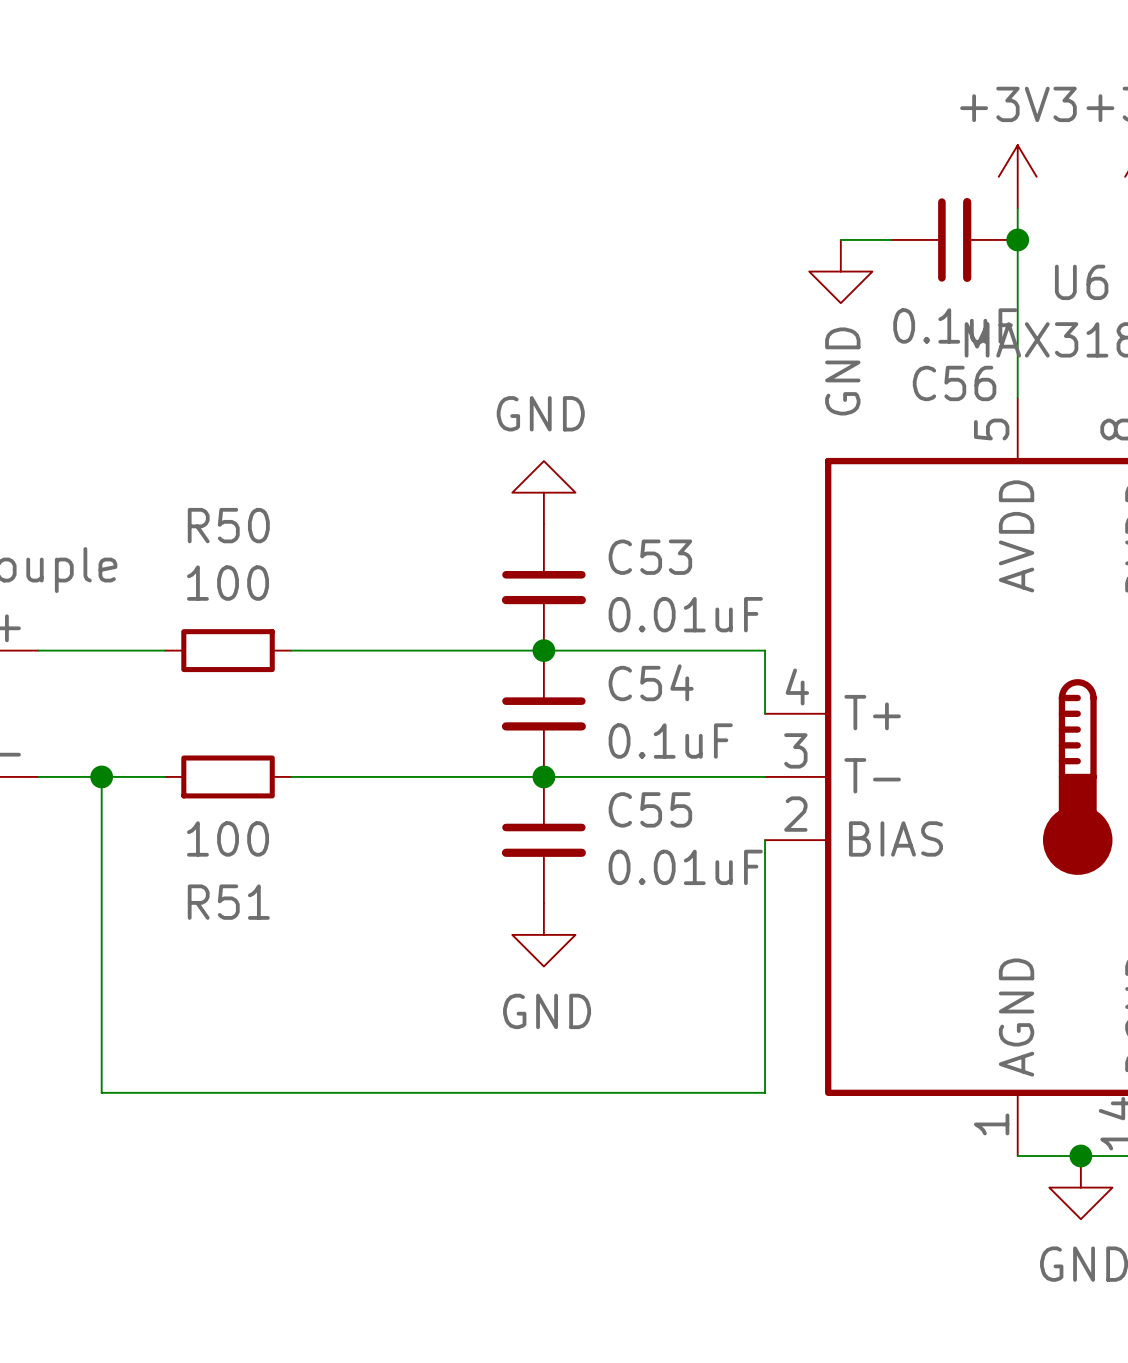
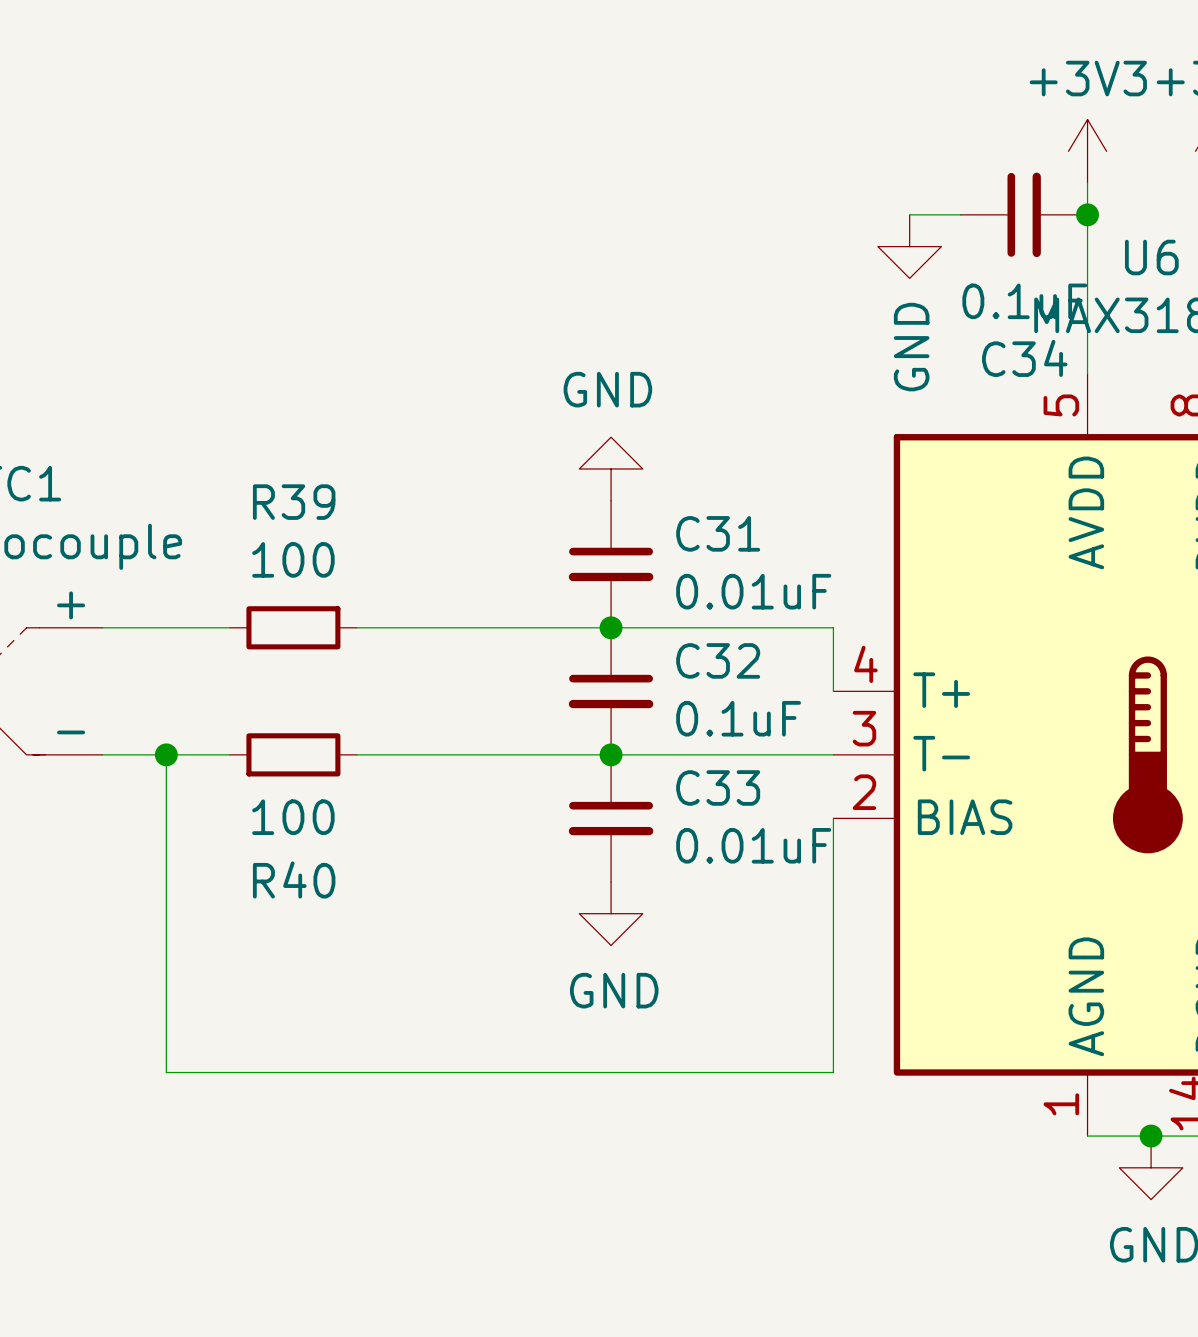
C56 name: C56 (954, 383) -> C34 (1024, 358)
R50 name: R50 (228, 525) -> R39 (294, 502)
C53 name: C53 (650, 557) -> C31 (718, 533)
C54 name: C54 (651, 682) -> C32 (718, 660)
C55 name: C55 (650, 809) -> C33 (718, 787)
R51 name: R51 (228, 902) -> R40 (294, 879)

